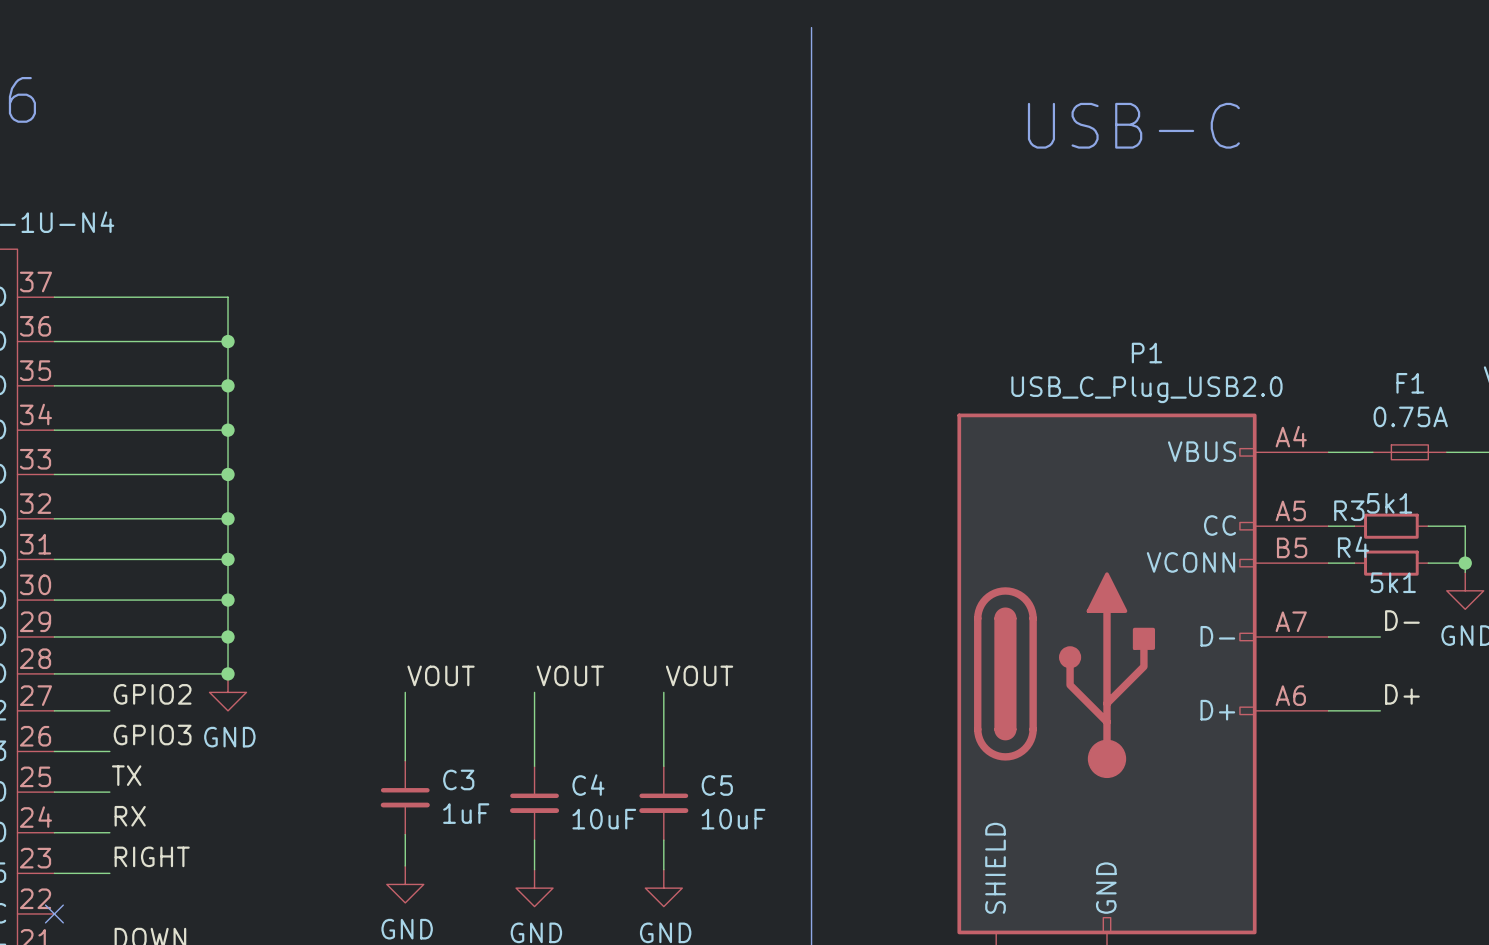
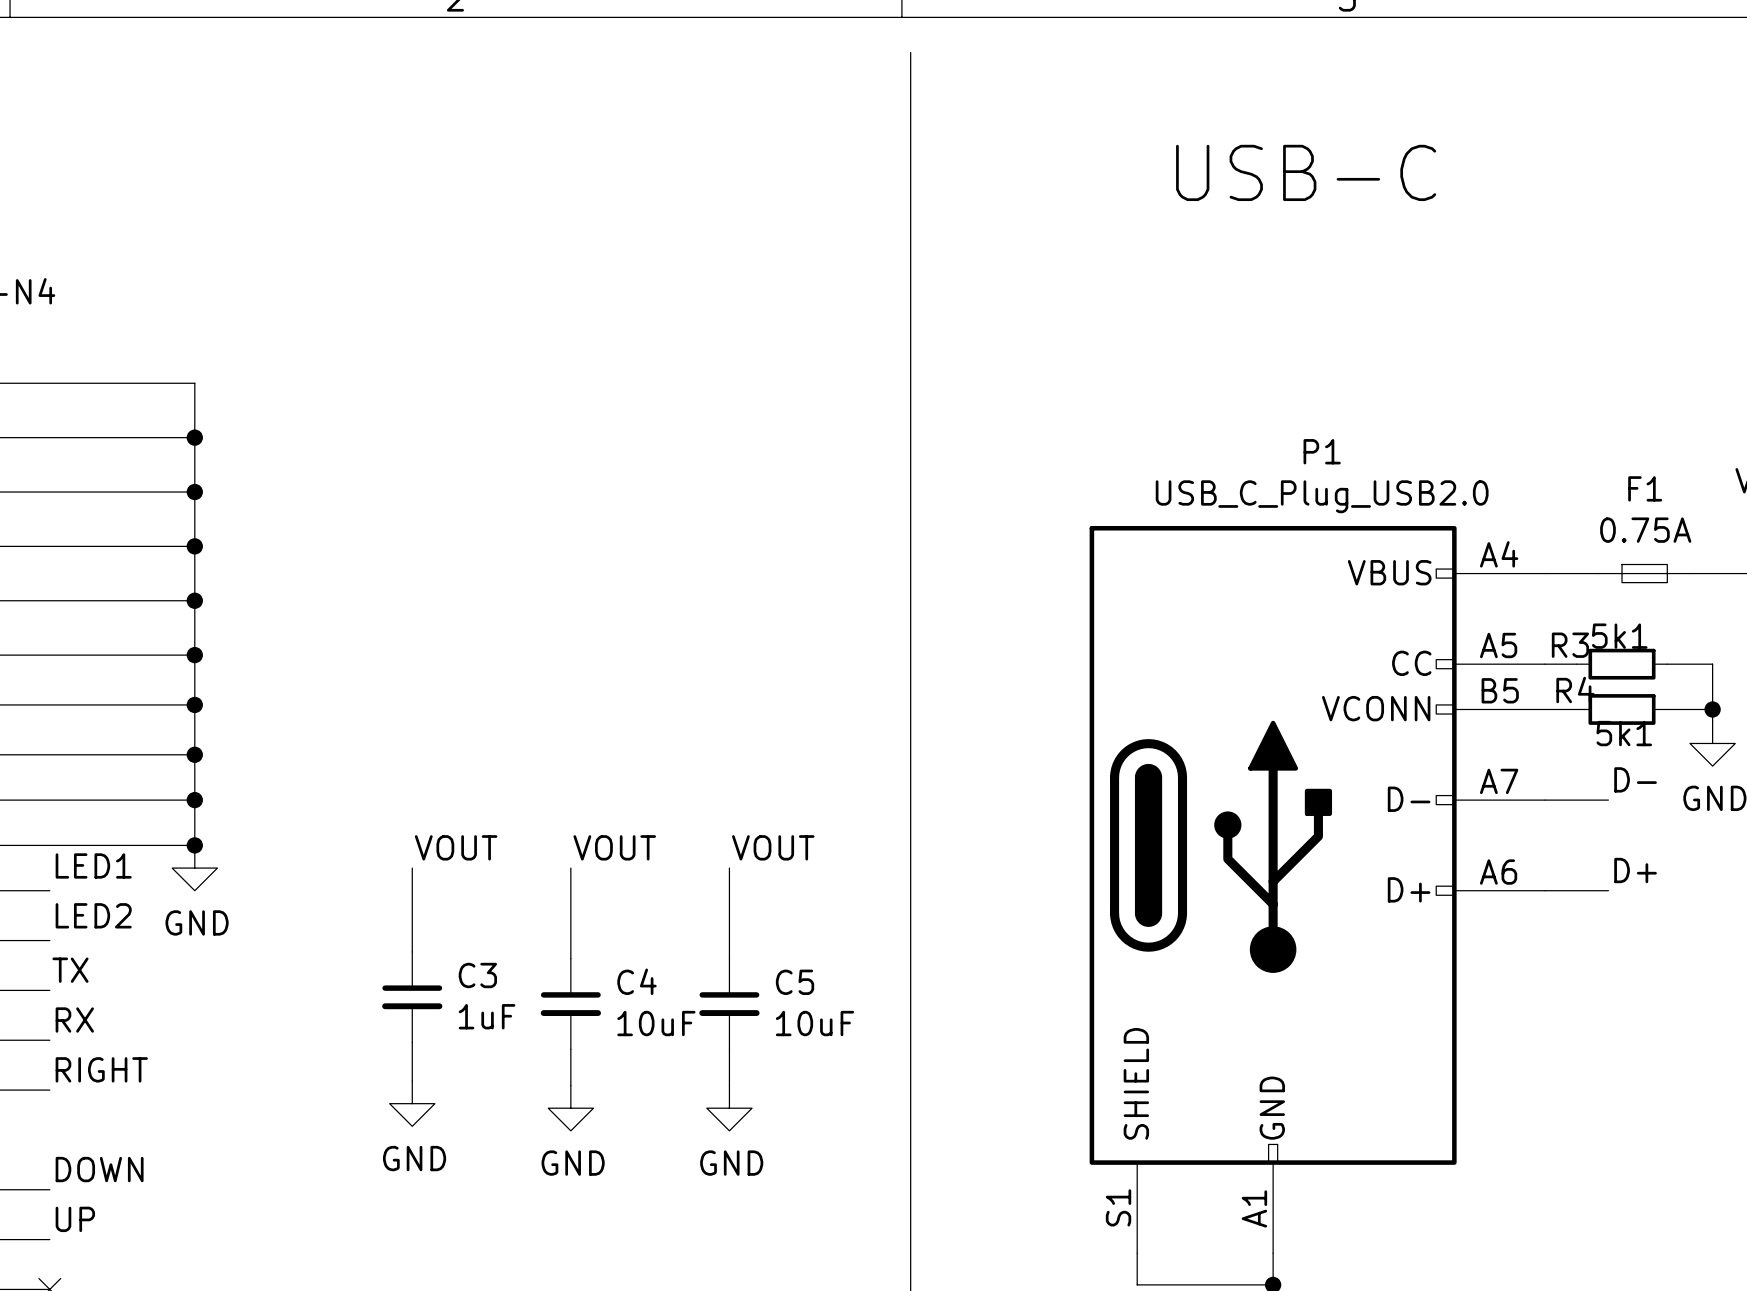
label: GPIO2 (152, 694) -> LED1 (93, 865)
label: GPIO3 (152, 735) -> LED2 (93, 915)

